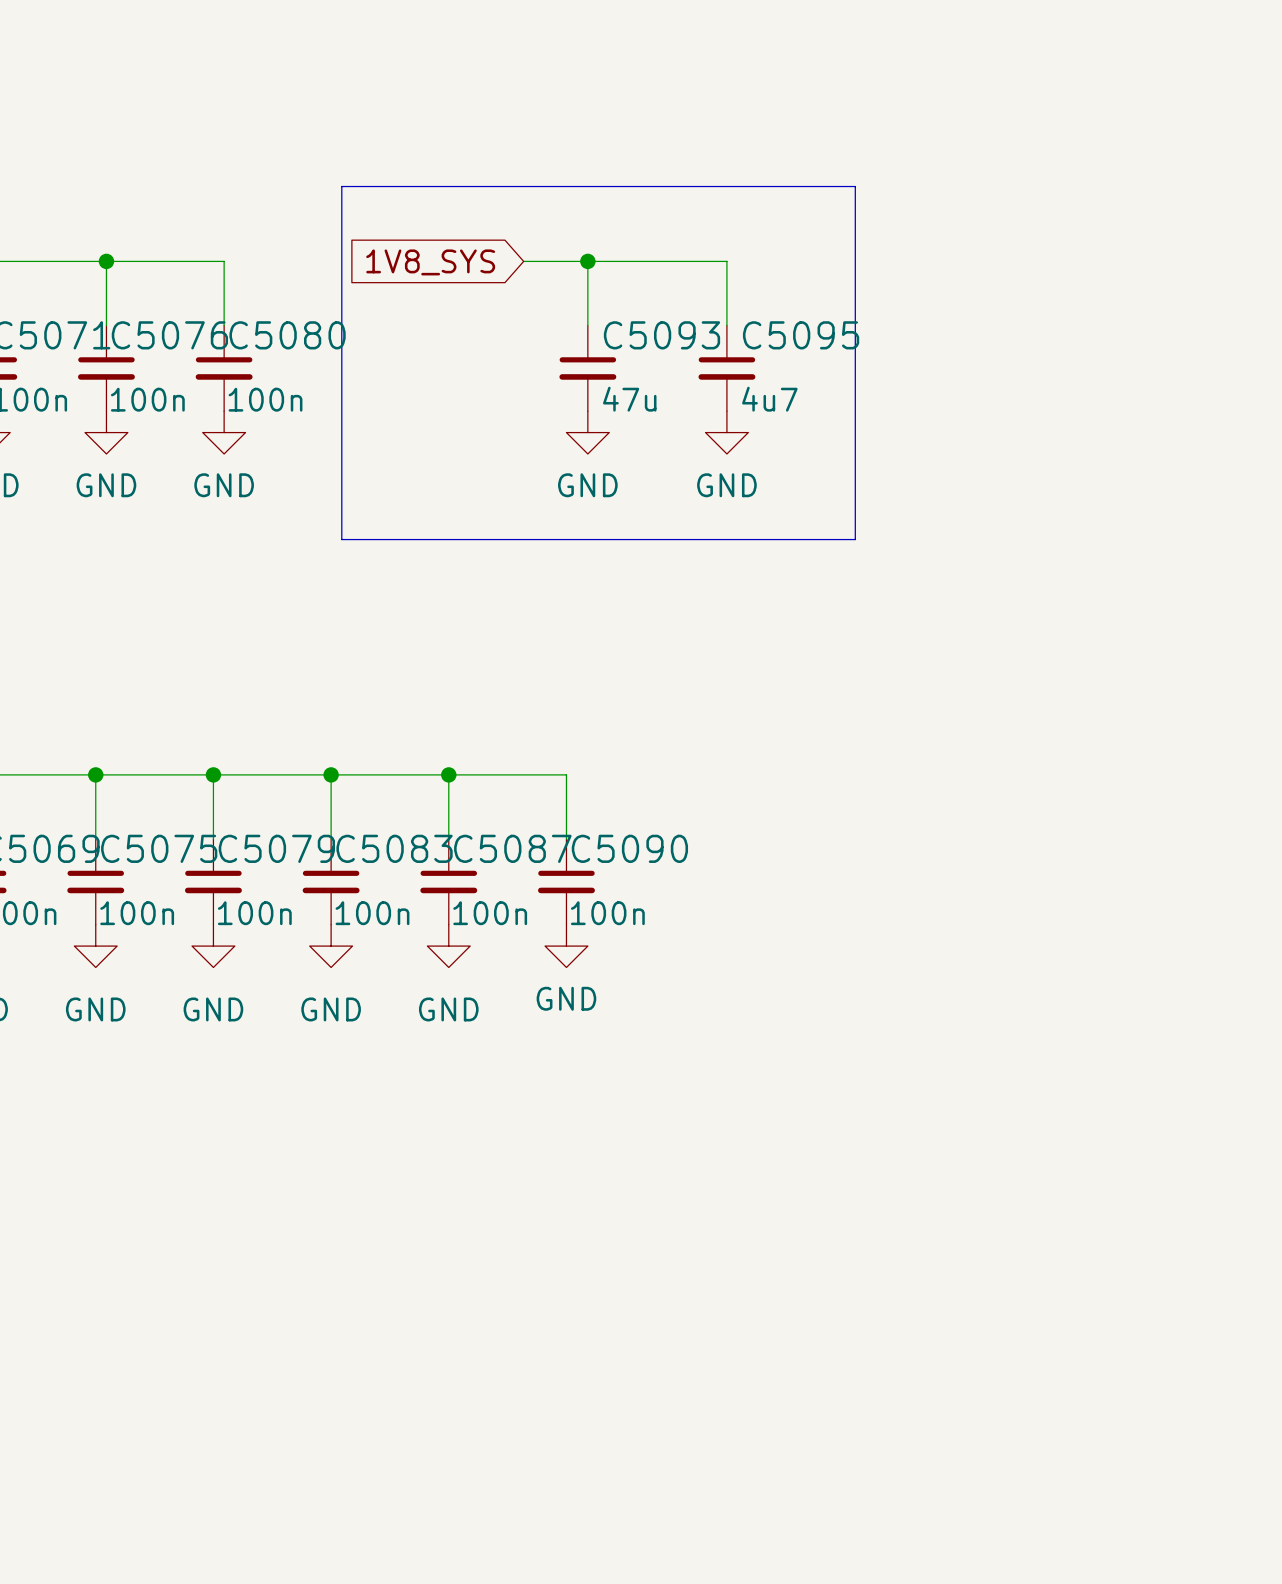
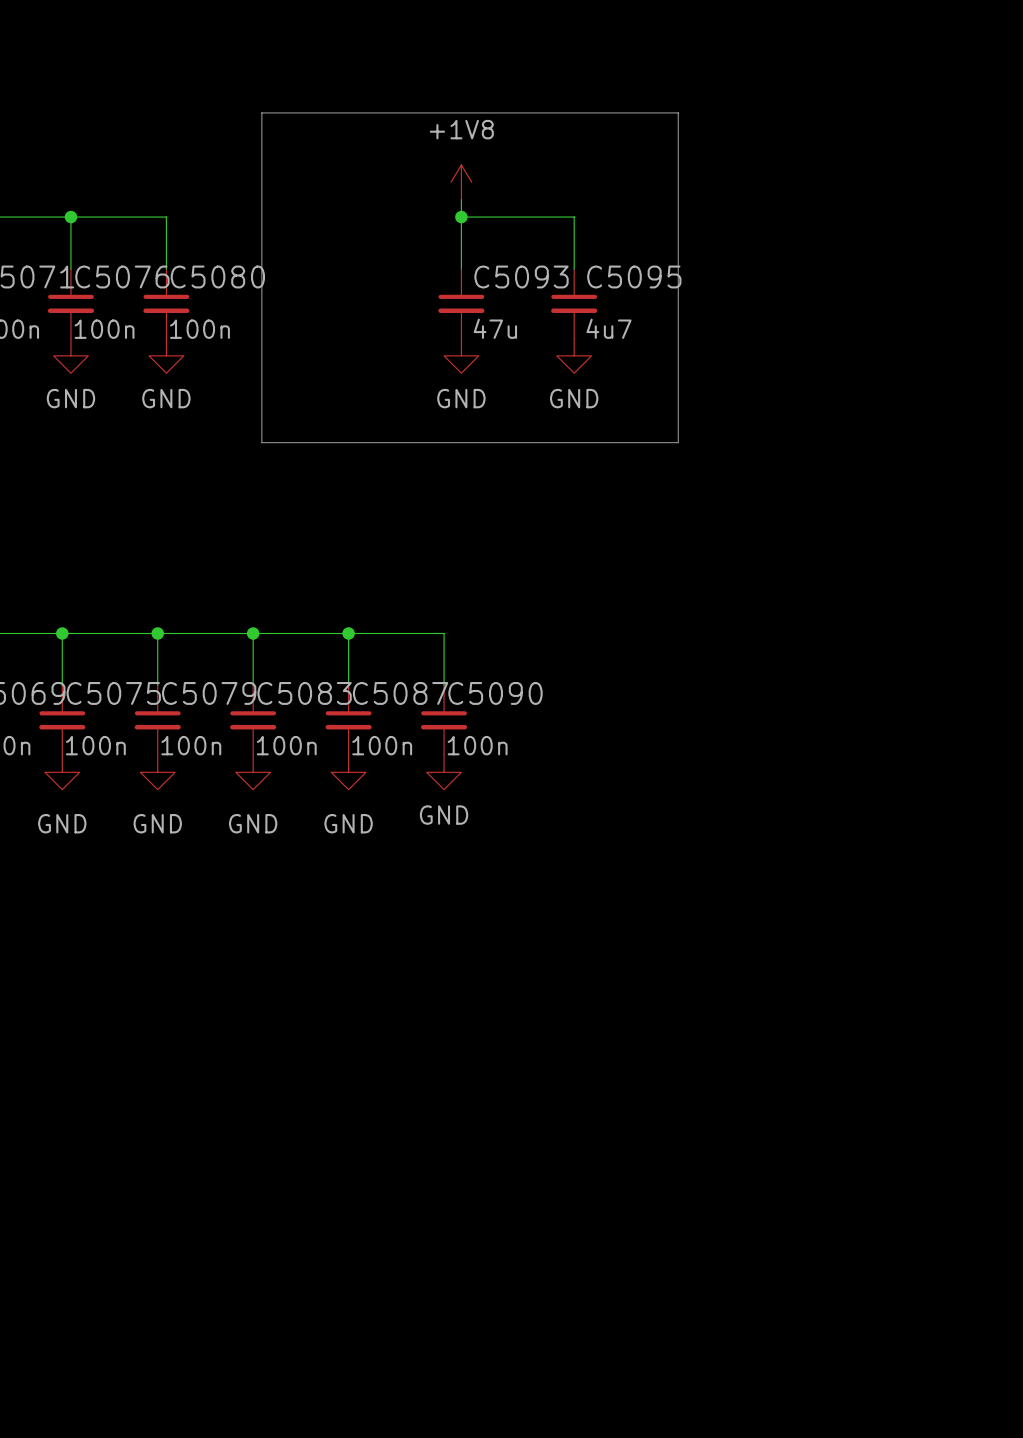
line: (341, 186) (855, 186) -> (261, 156) (261, 112) (678, 112) (678, 156)
power symbol: none -> +1V8 (461, 182)
wire: (523, 261) (587, 261) -> (461, 199) (461, 217)
global label: 1V8_SYS (430, 262) -> none

